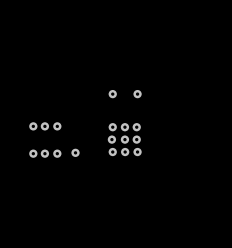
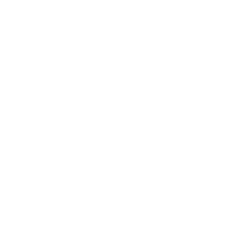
via: (112, 94) -> none
via: (137, 94) -> none
via: (33, 126) -> none
via: (44, 126) -> none
via: (57, 126) -> none
via: (112, 127) -> none
via: (124, 127) -> none
via: (136, 127) -> none
via: (111, 139) -> none
via: (124, 139) -> none
via: (136, 139) -> none
via: (75, 152) -> none
via: (112, 152) -> none
via: (125, 152) -> none
via: (137, 152) -> none
via: (33, 153) -> none
via: (44, 153) -> none
via: (57, 153) -> none

